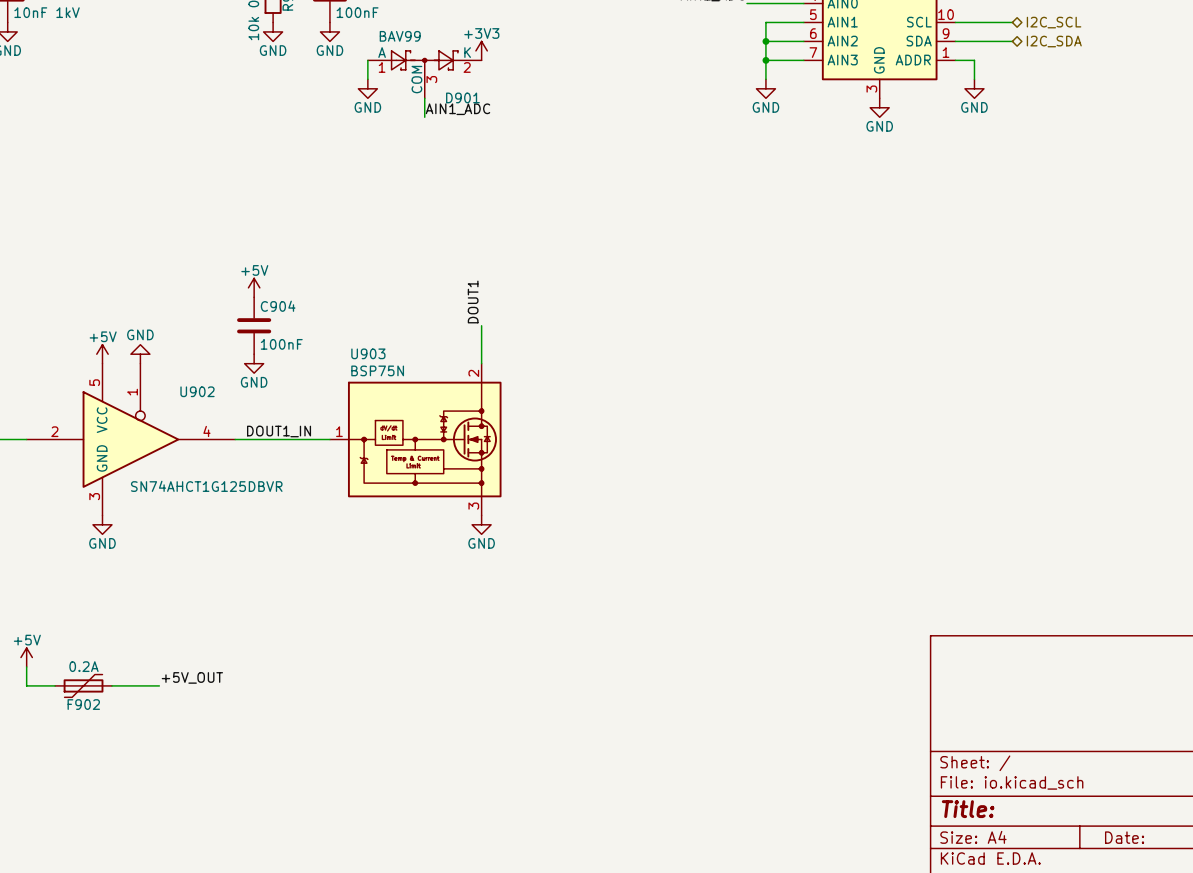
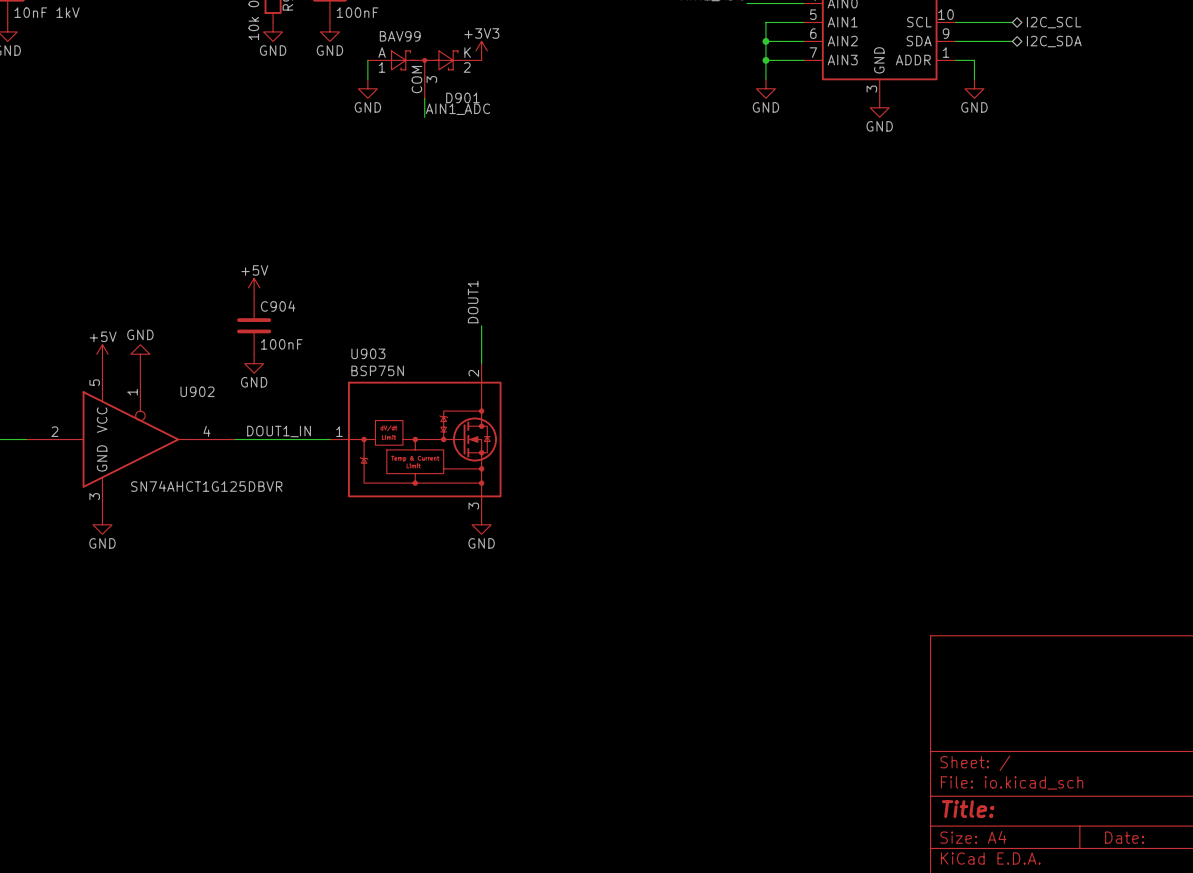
power symbol: +5V (26, 657) -> none
wire: (26, 666) (26, 685) (55, 685) -> none
label: +5V_OUT (192, 677) -> none
F902: 0.2A (83, 685) -> none
wire: (111, 685) (159, 685) -> none

